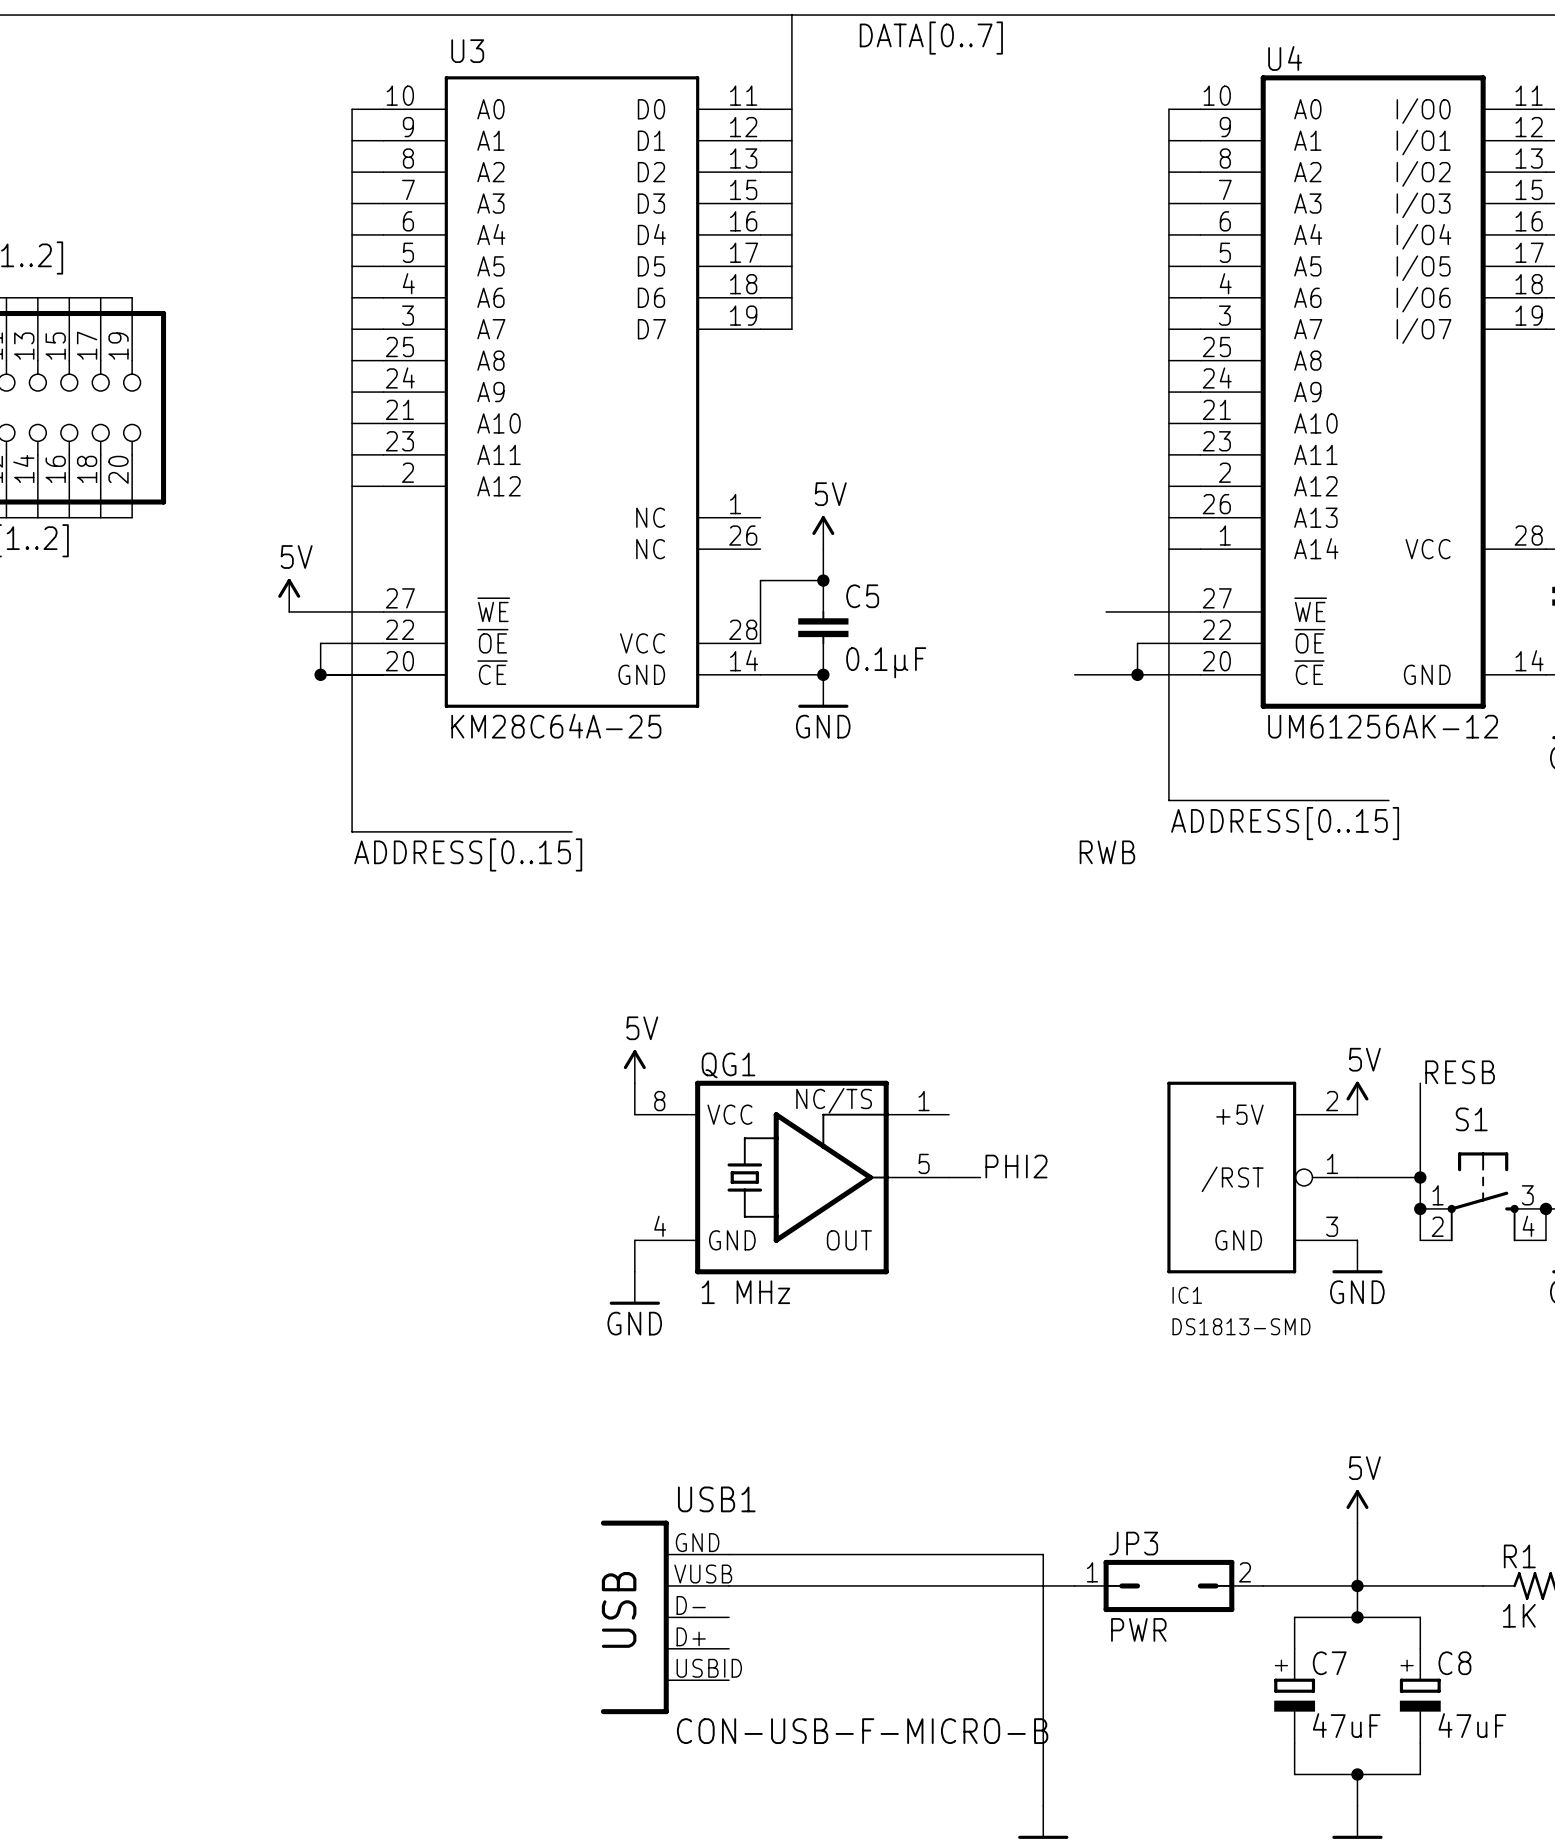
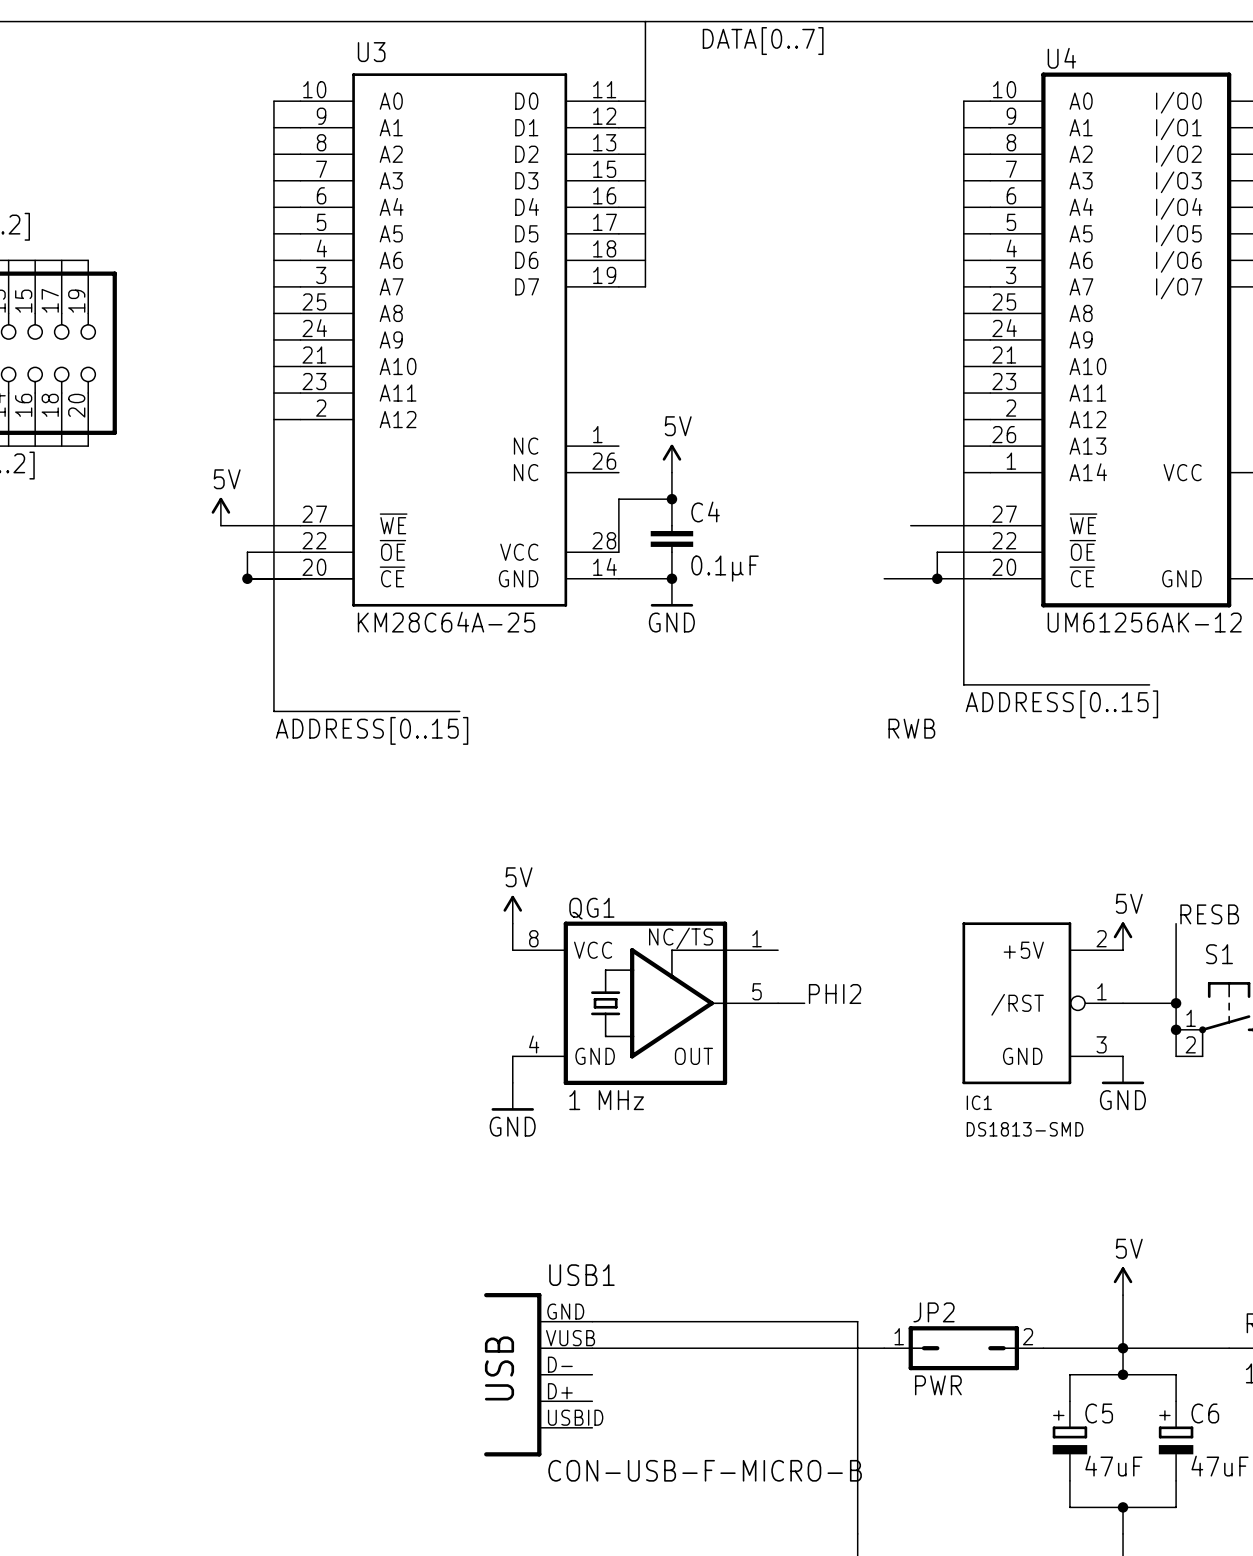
C5 name: C5 (862, 596) -> C4 (705, 511)
JP3 name: JP3 (1133, 1543) -> JP2 (934, 1312)
C7 name: C7 (1329, 1663) -> C5 (1099, 1413)
C8 name: C8 (1454, 1663) -> C6 (1205, 1413)

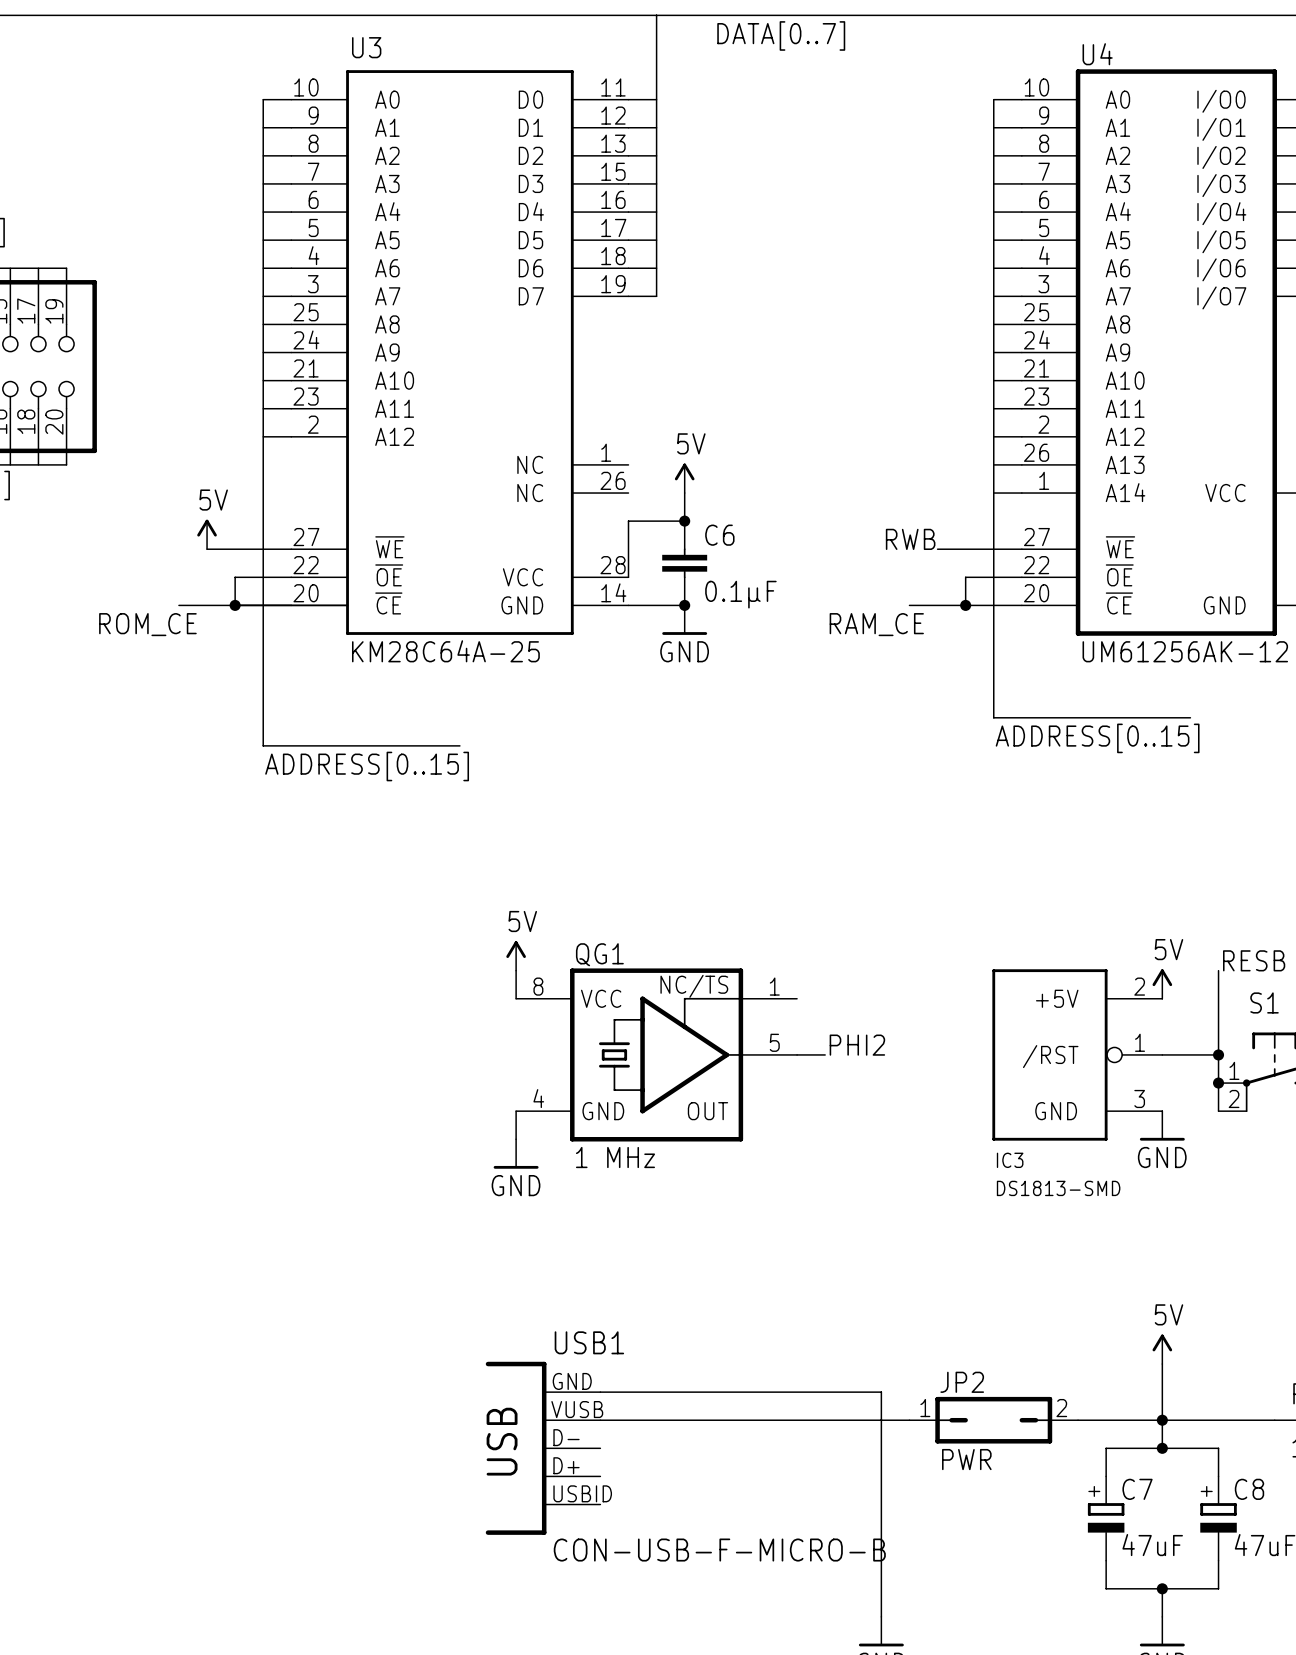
C4 name: C4 (705, 511) -> C6 (719, 535)
wire: none -> (178, 605) (235, 605)
label: none -> ROM_CE (147, 624)
label: none -> RAM_CE (876, 624)
label position: RWB (911, 728) -> RWB (910, 539)
IC1 name: IC1 (979, 1102) -> IC3 (1010, 1160)
C5 name: C5 (1099, 1413) -> C7 (1137, 1489)
C6 name: C6 (1205, 1413) -> C8 (1249, 1489)

